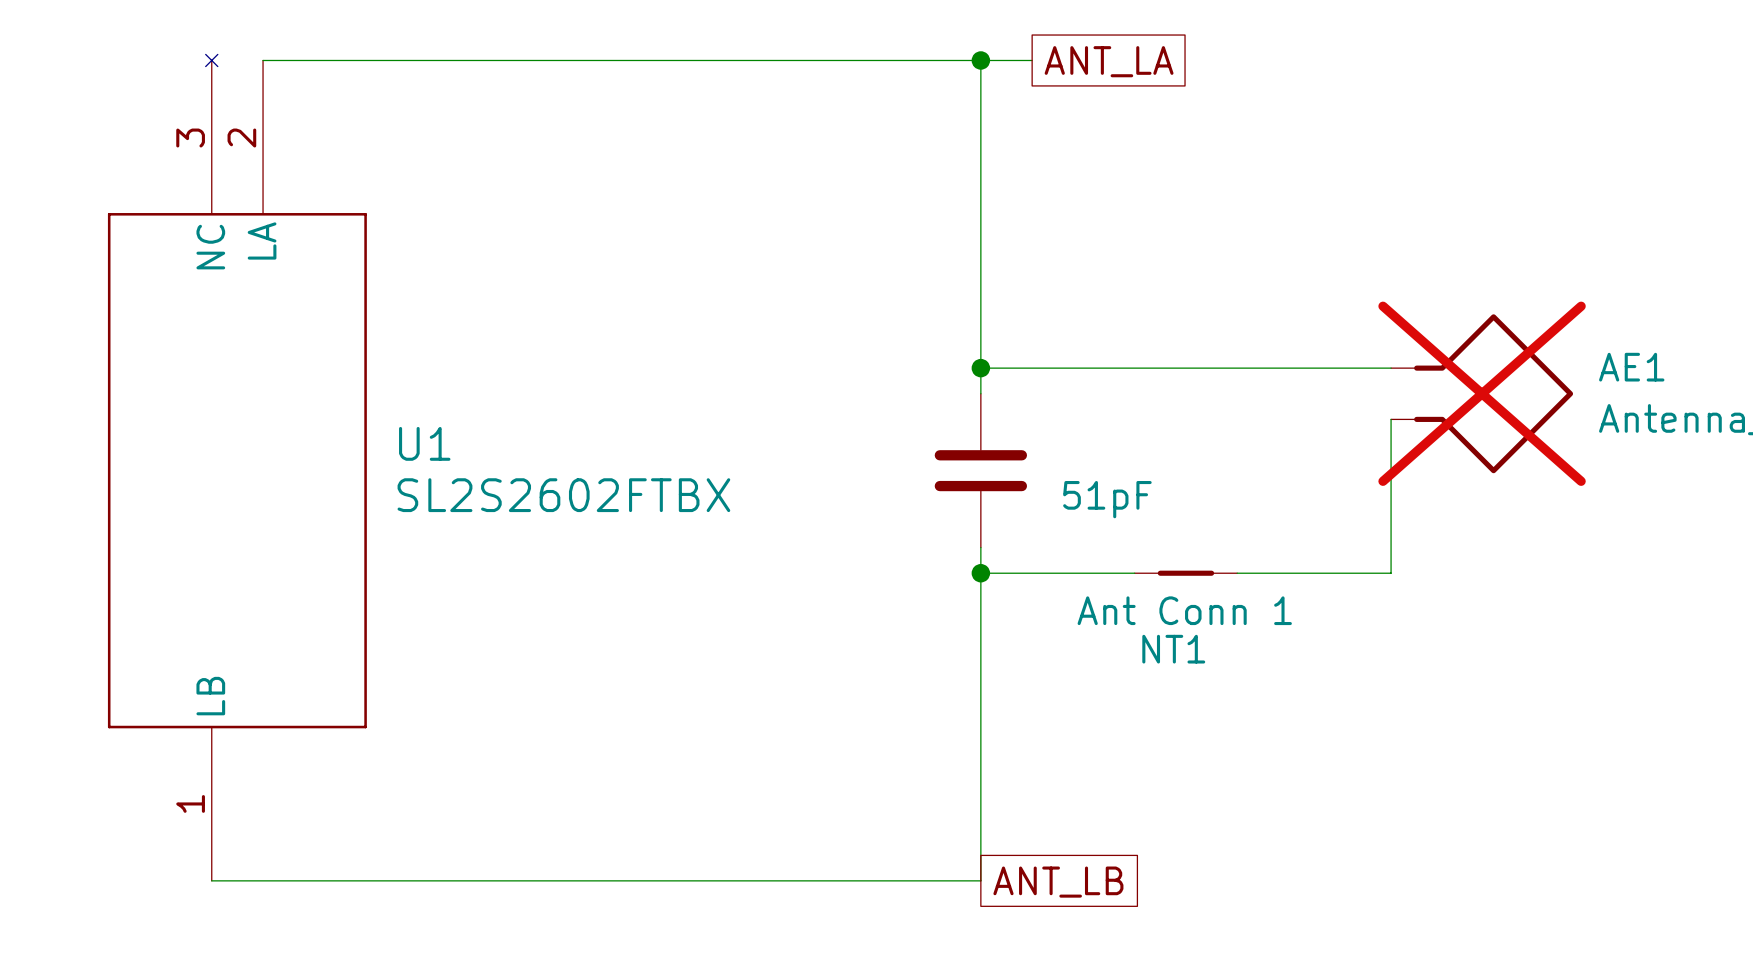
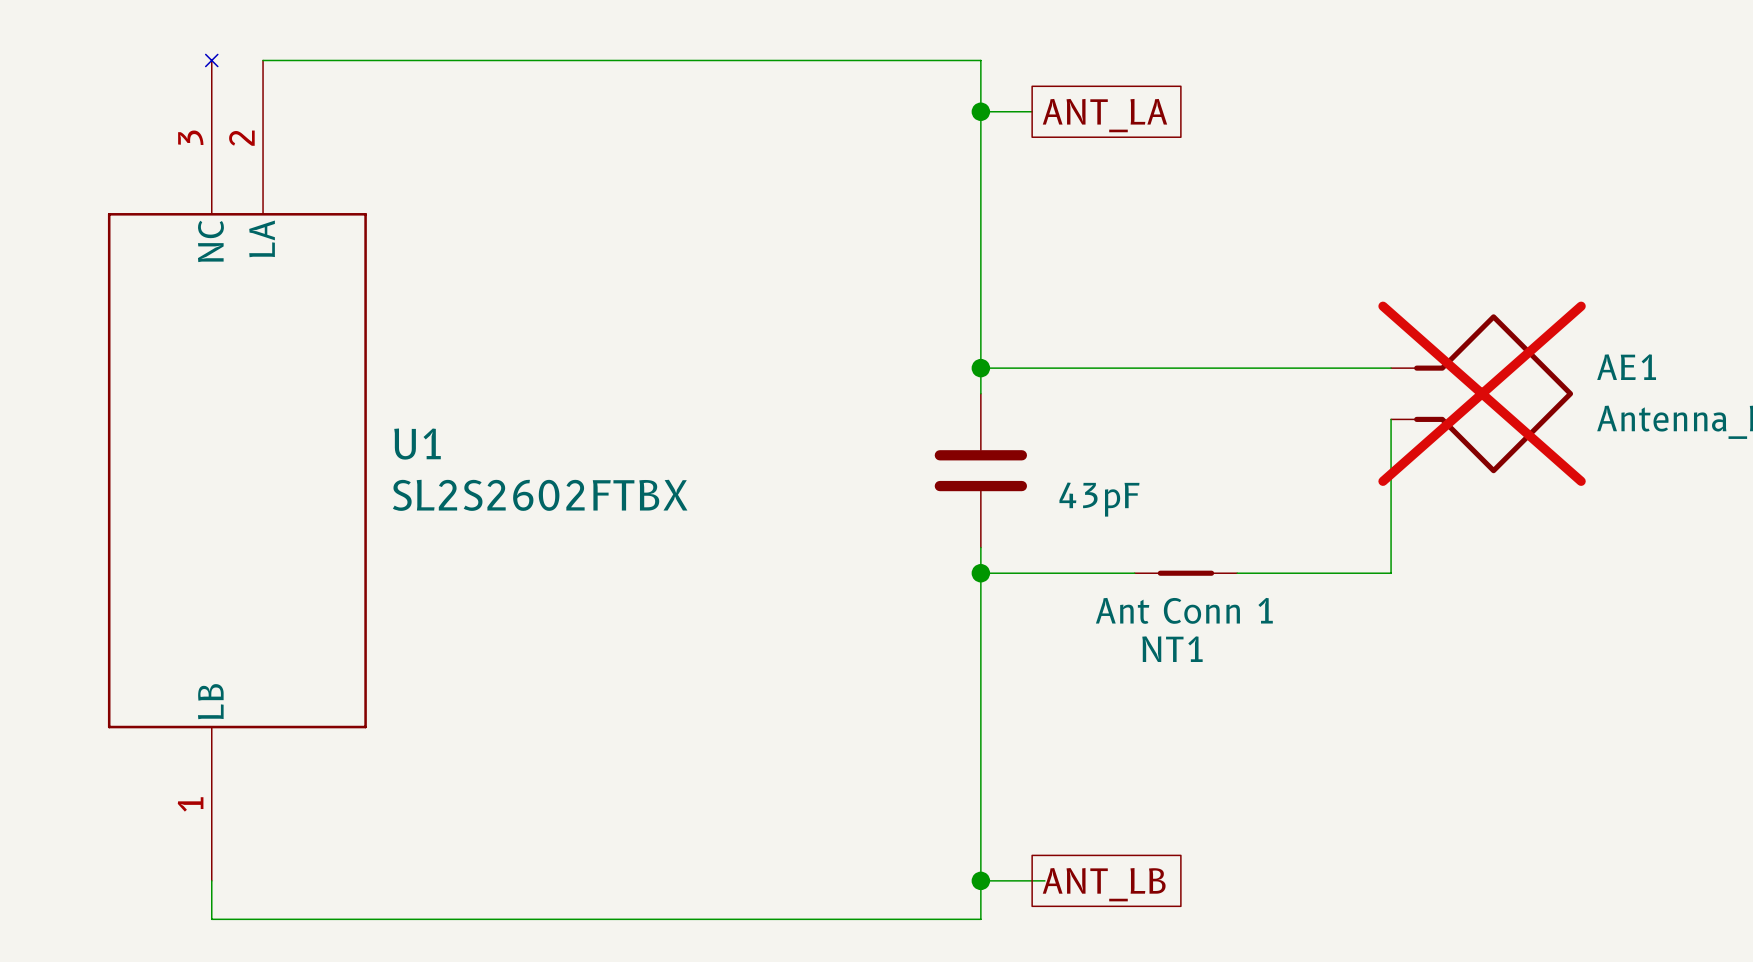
wire: (980, 60) (1032, 60) -> (980, 111) (1032, 111)
junction position: (980, 60) -> (980, 111)
global label position: ANT_LA (1109, 61) -> ANT_LA (1104, 115)
part value: 51pF (1107, 499) -> 43pF (1099, 499)
wire: (211, 880) (980, 880) -> (211, 880) (211, 919) (980, 919) (980, 880) (1044, 880)
junction: none -> (980, 880)
global label position: ANT_LB (1058, 882) -> ANT_LB (1104, 884)

